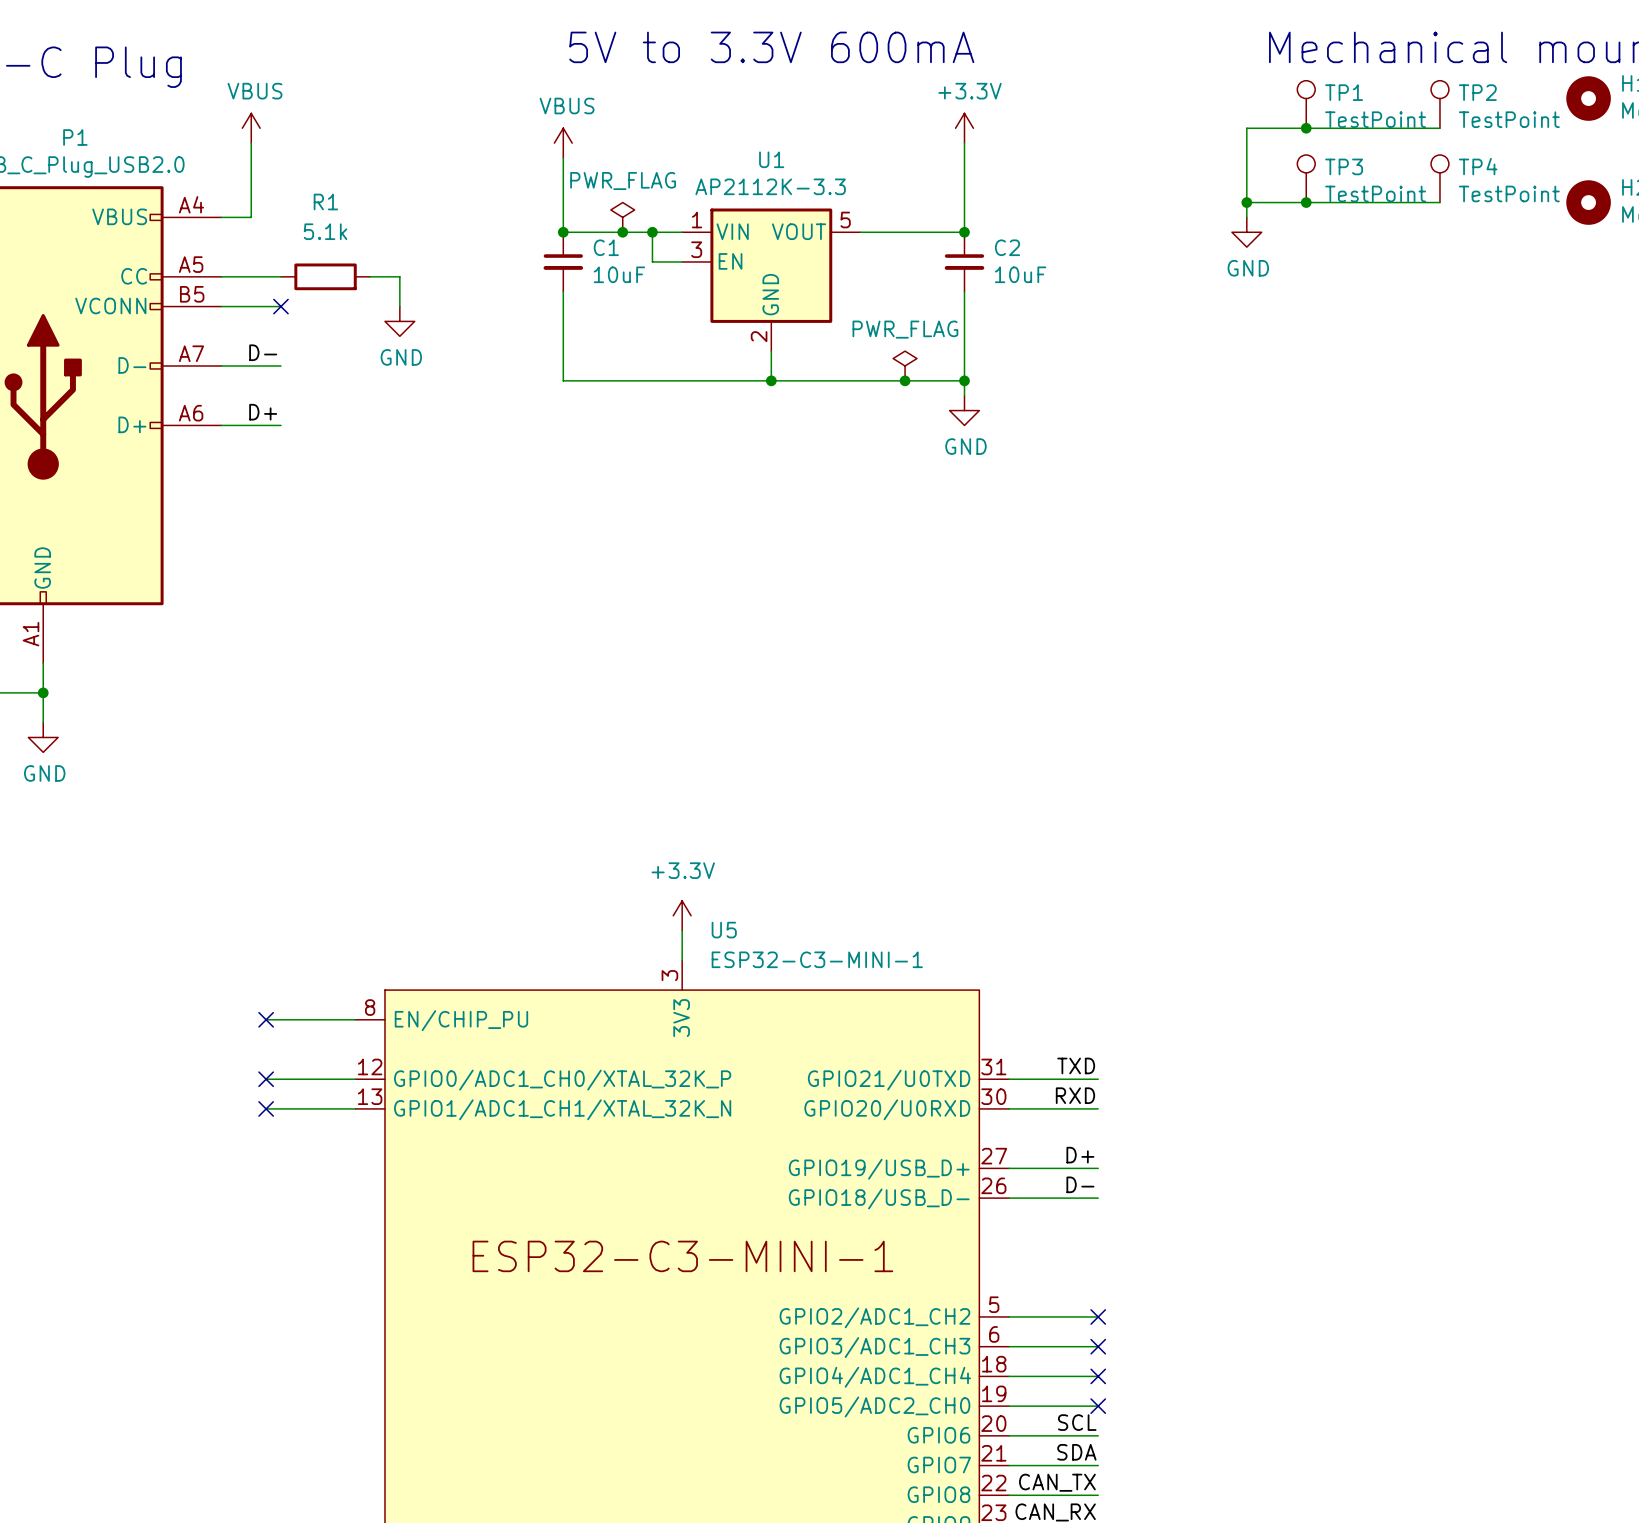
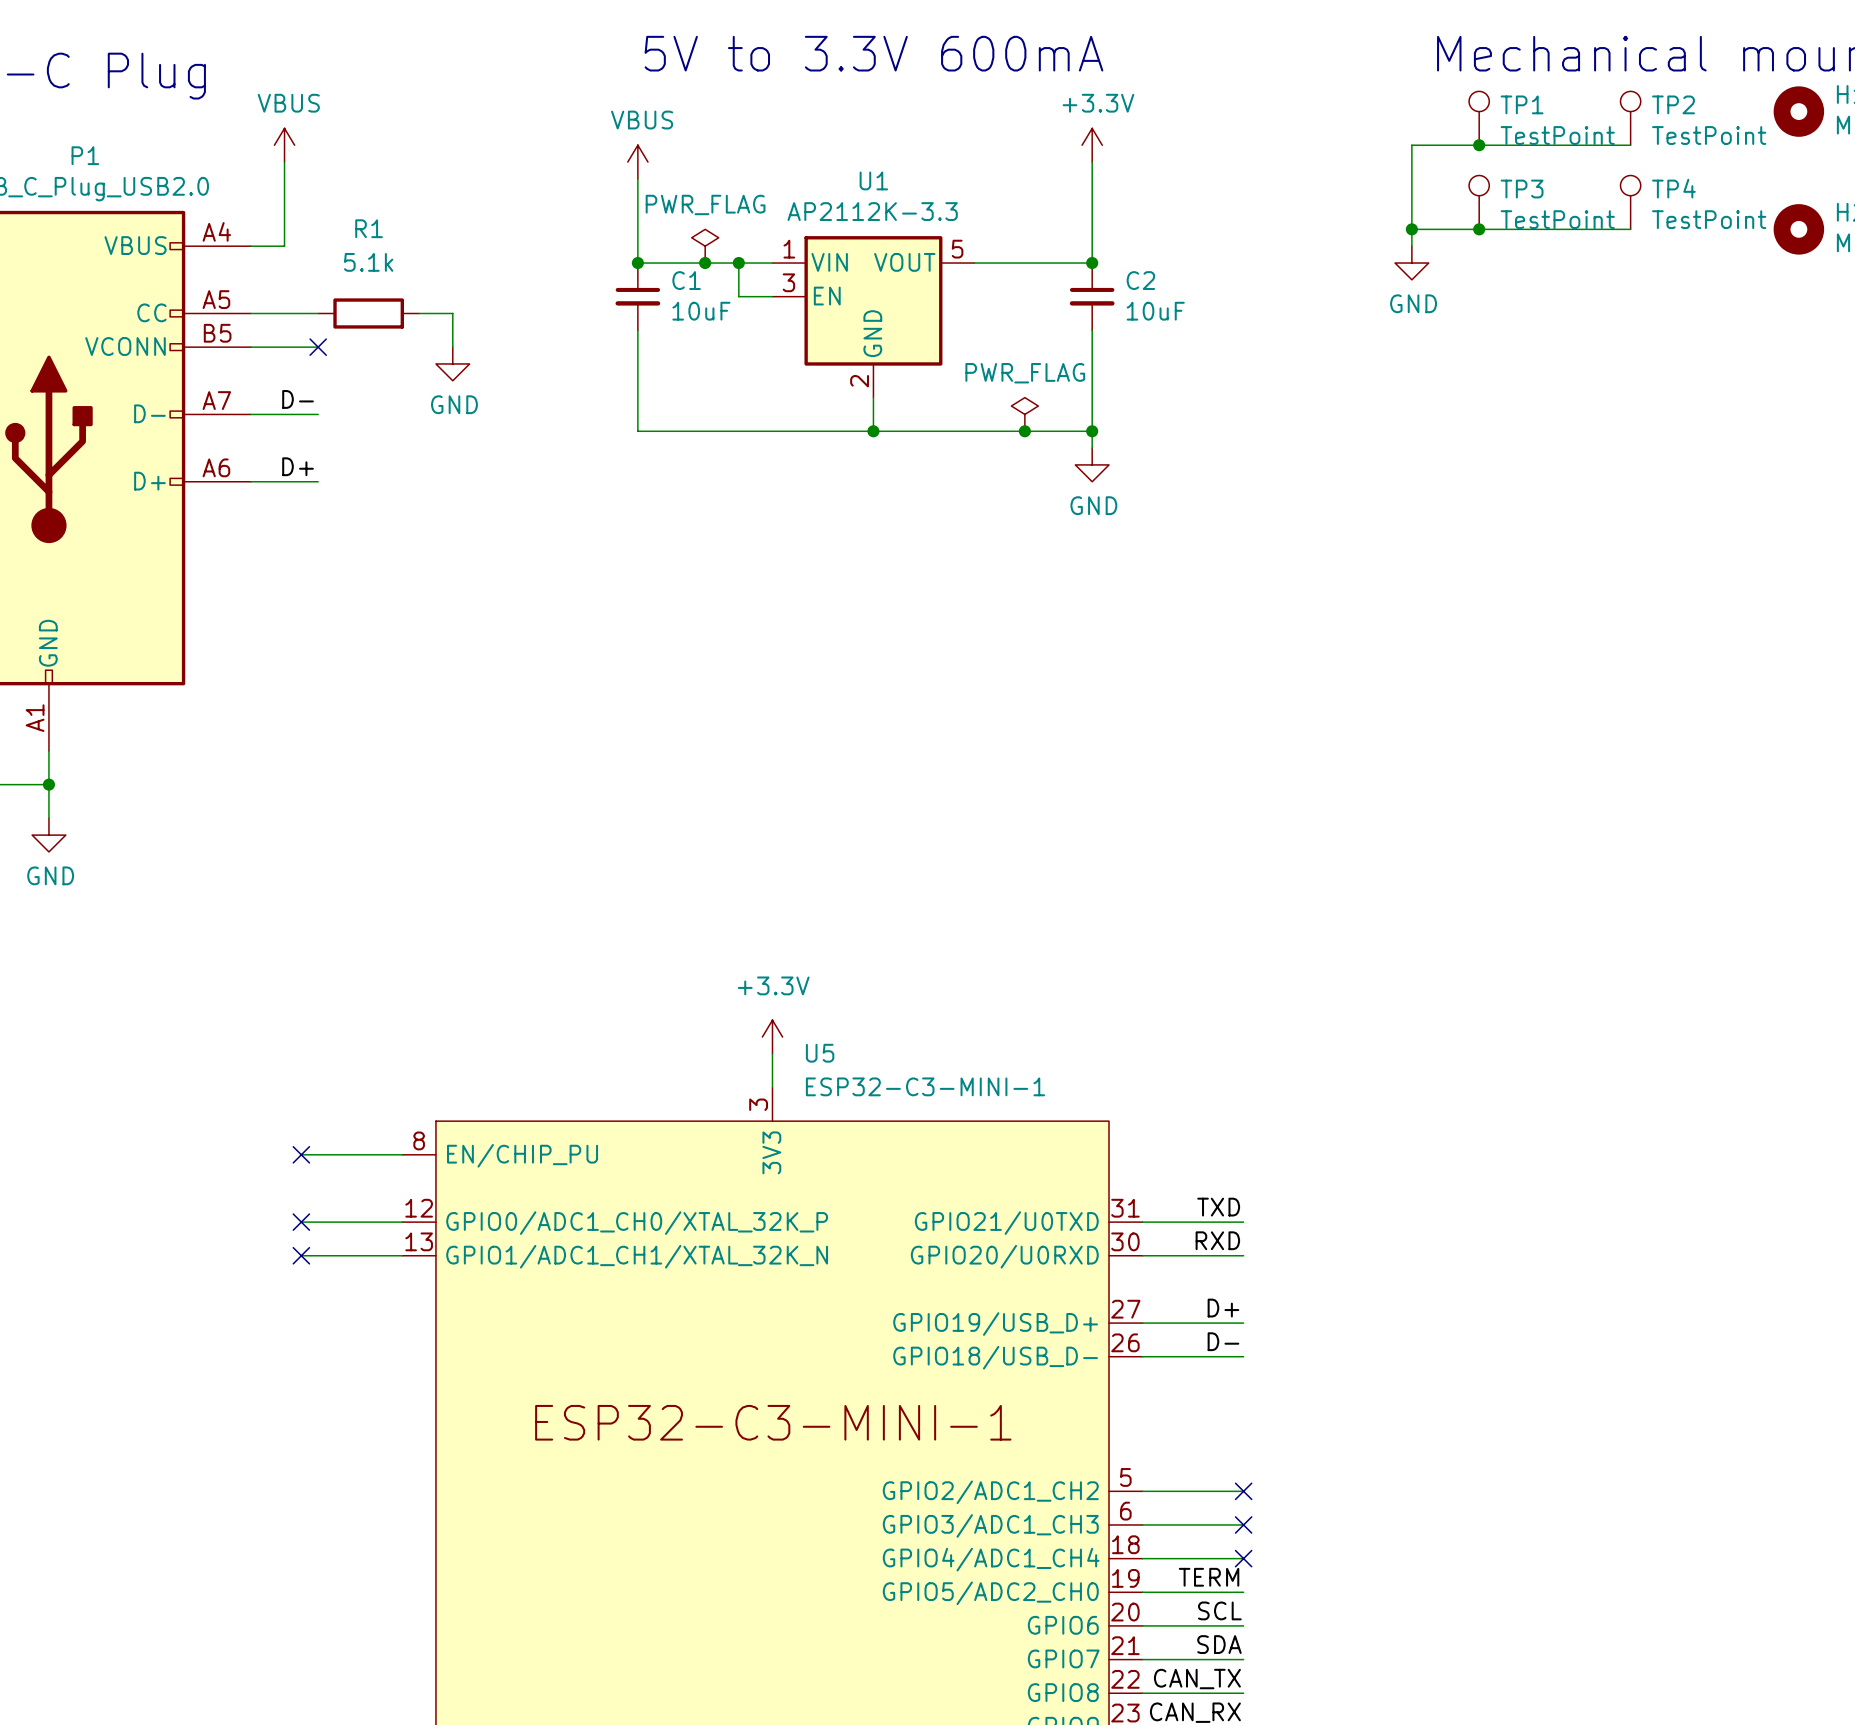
label: none -> TERM (1209, 1577)
no-connect mark: (1098, 1406) -> none

